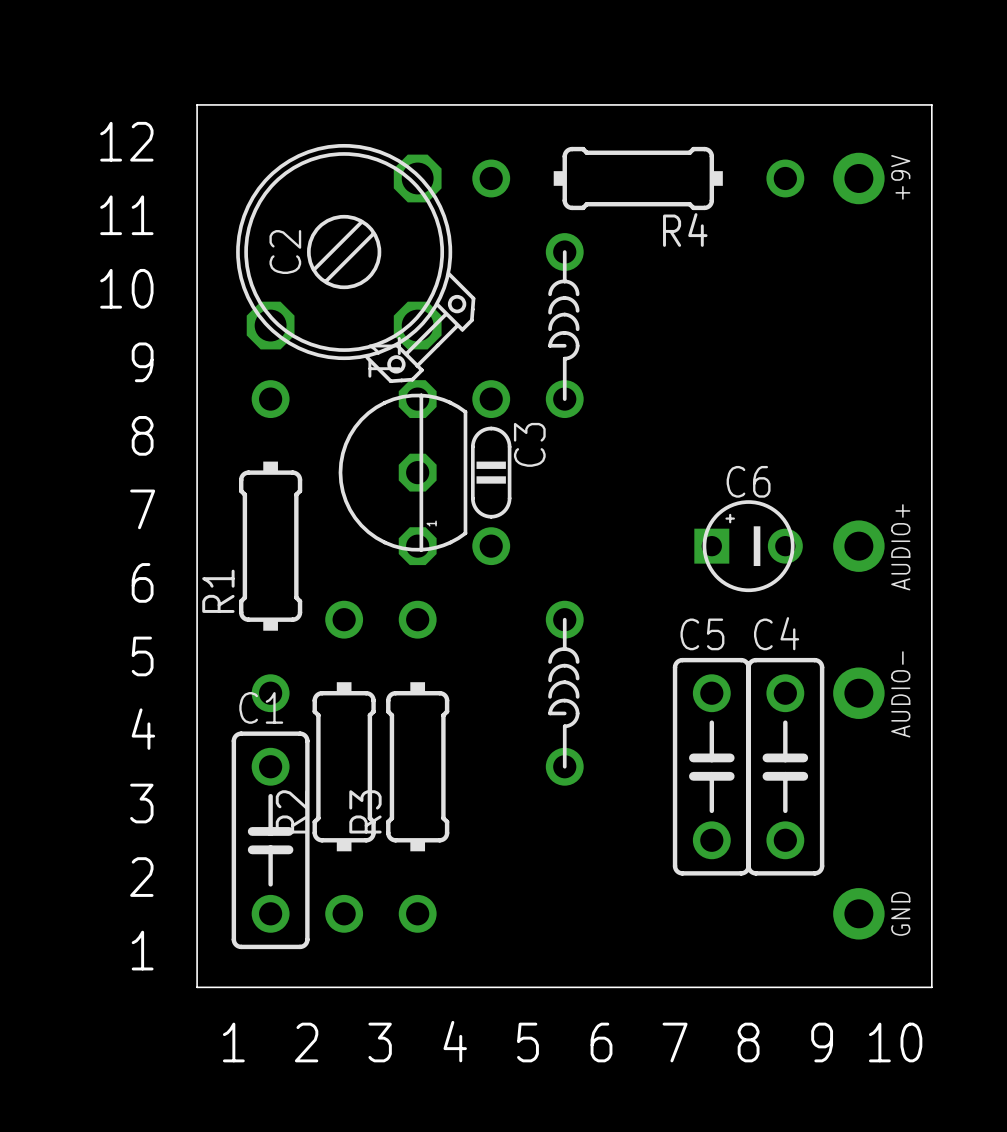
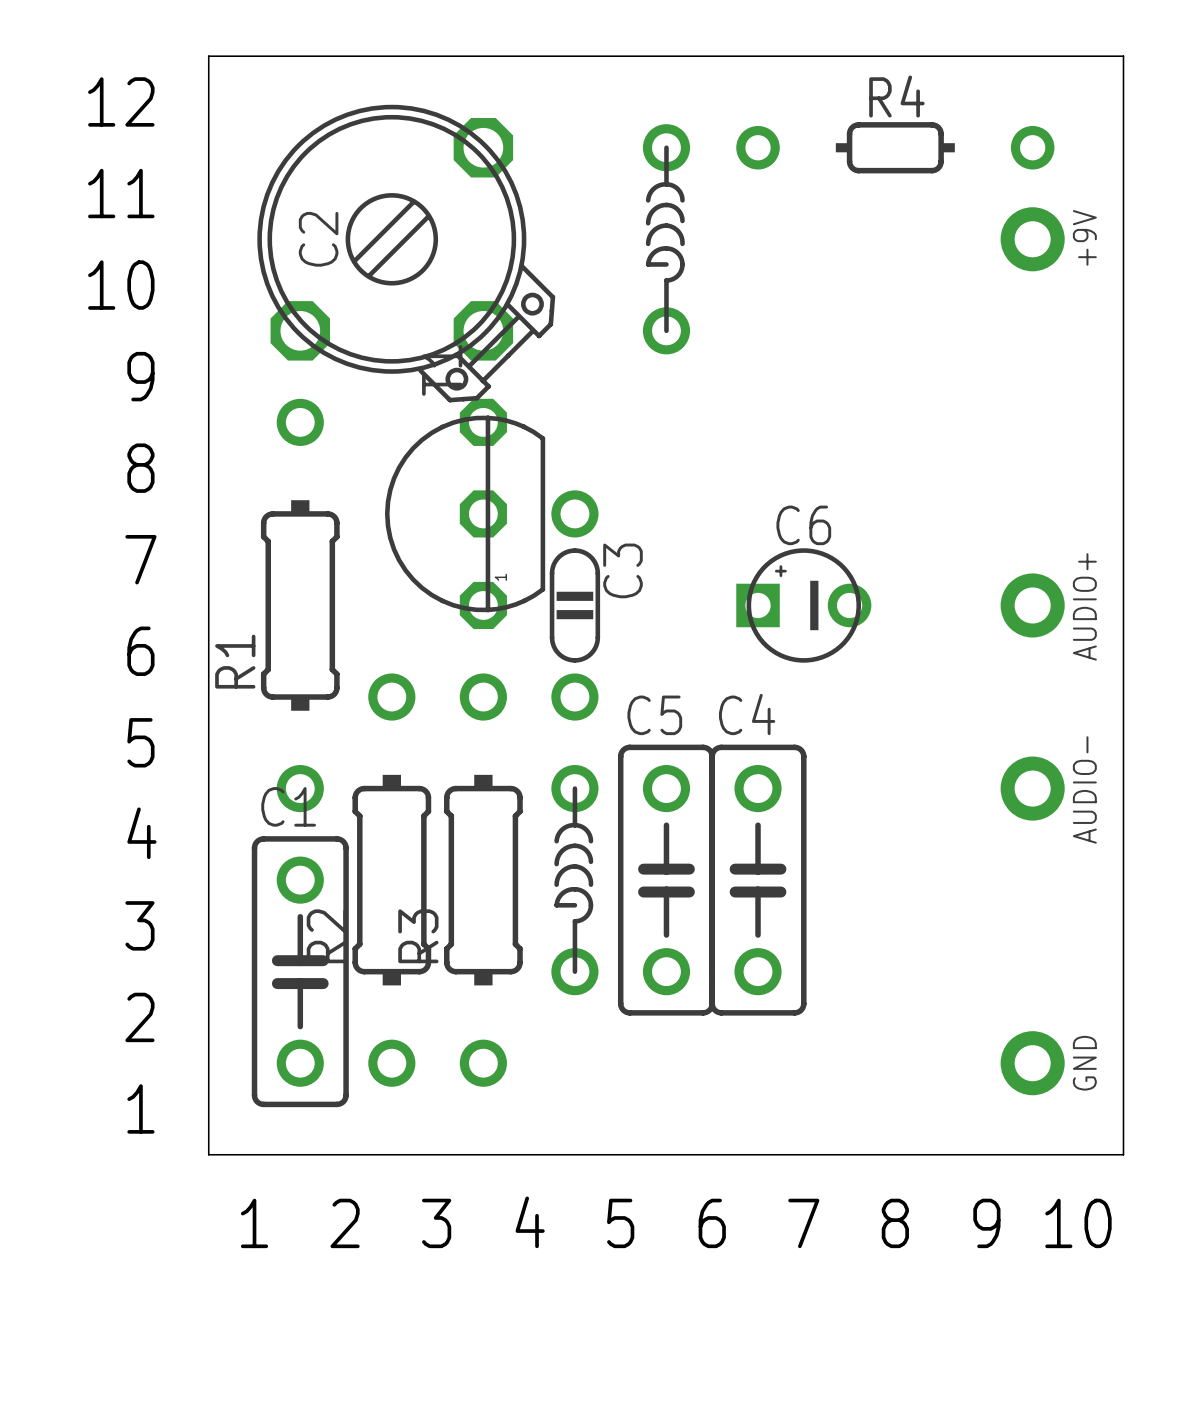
R4 footprint: [472, 146, 805, 211] -> [736, 122, 1055, 174]
+9V position: (858, 178) -> (1032, 239)
R4 name position: R4 (685, 230) -> R4 (896, 96)
part position: (564, 325) -> (666, 239)
C3 position: (491, 472) -> (574, 605)
C6 position: (748, 546) -> (803, 605)
part position: (564, 693) -> (574, 880)
C5 position: (711, 766) -> (666, 880)
C4 position: (785, 766) -> (758, 880)

